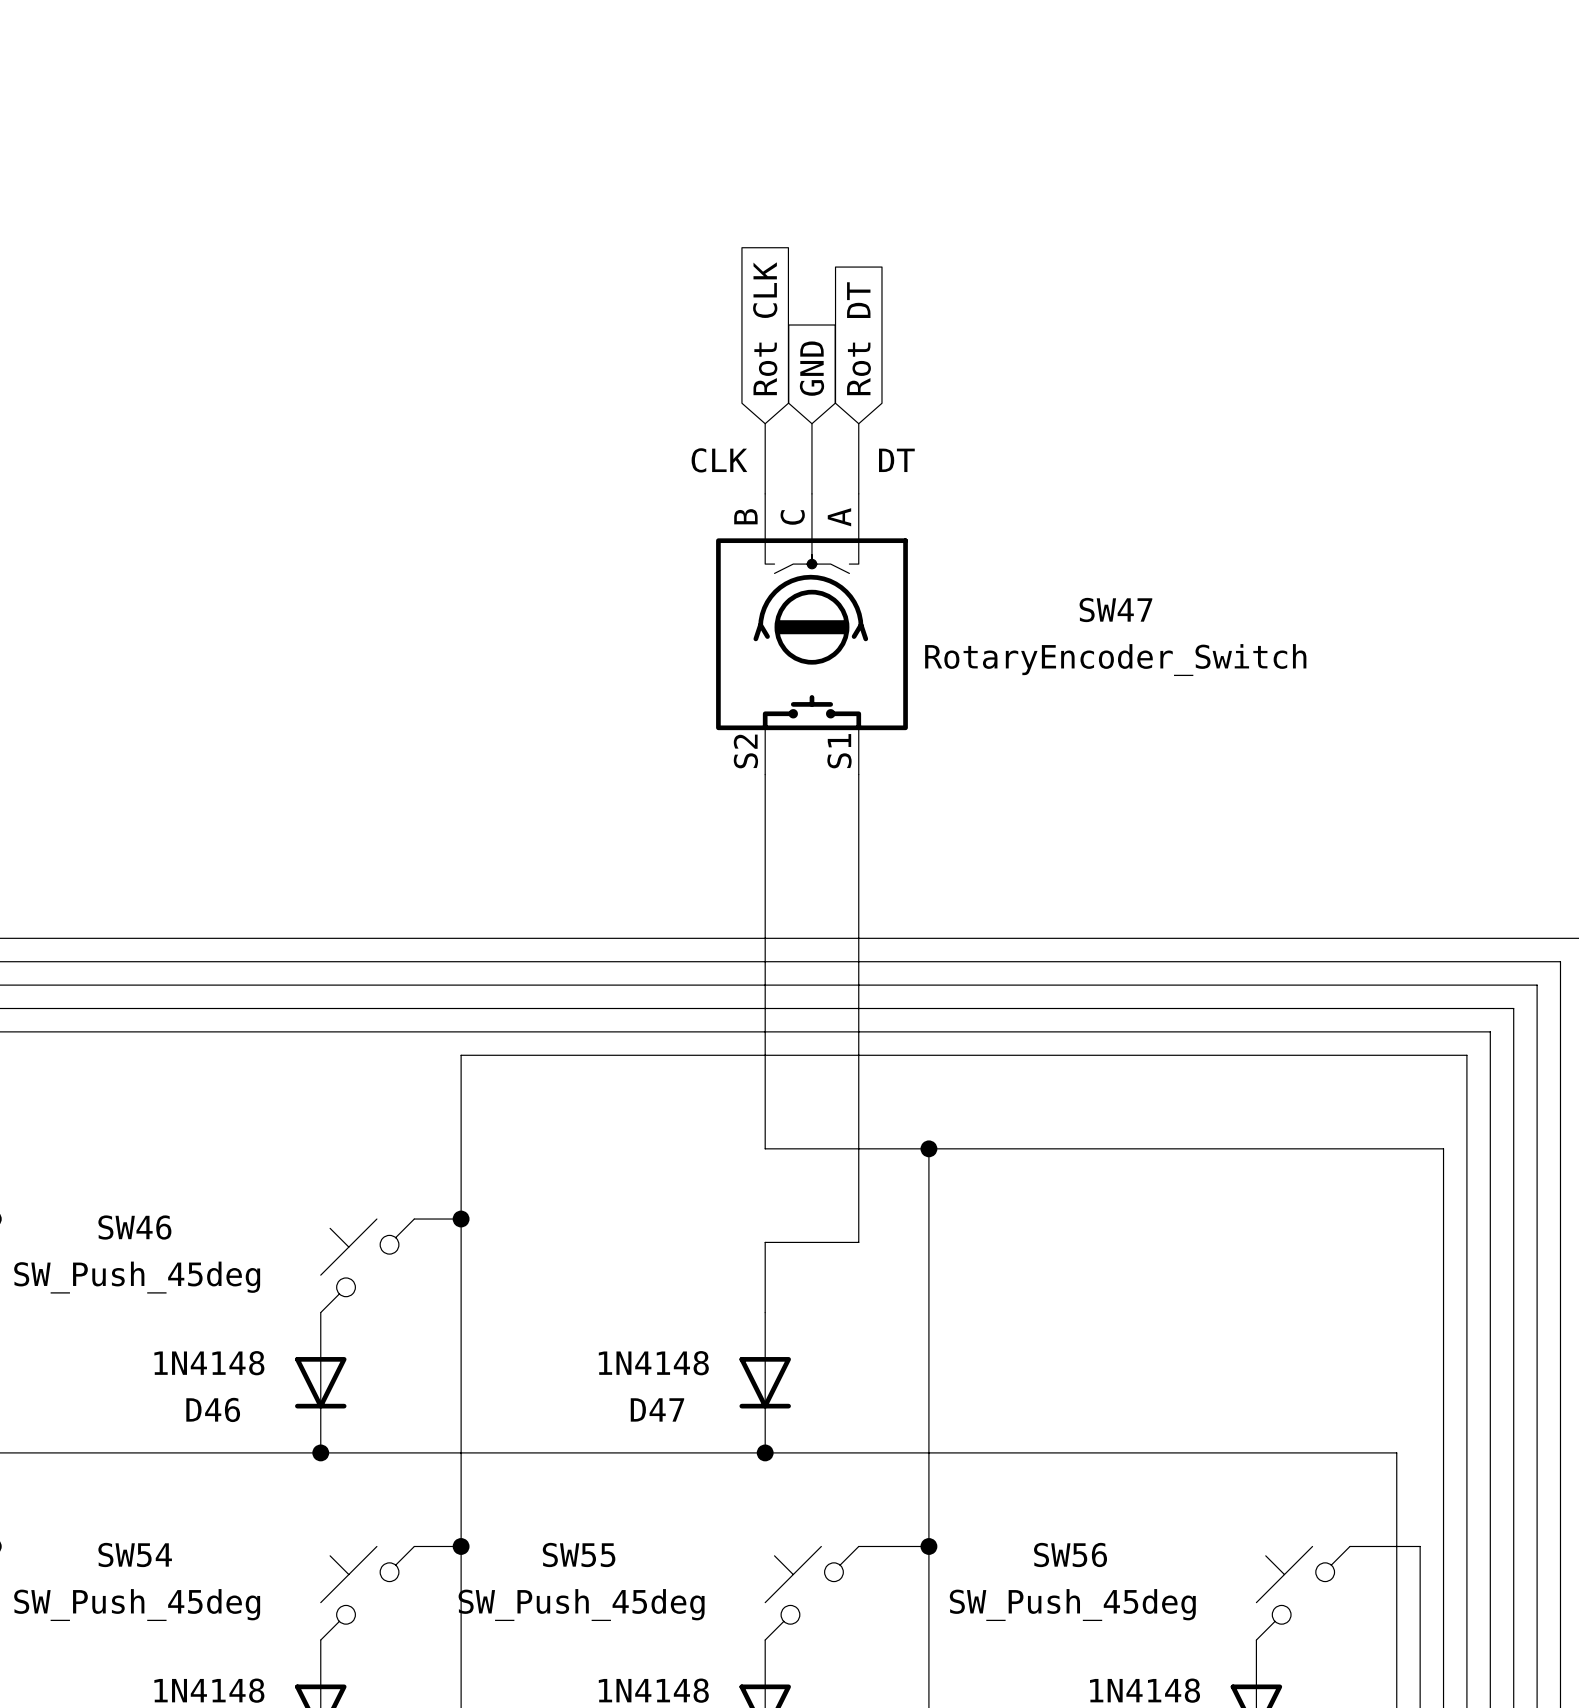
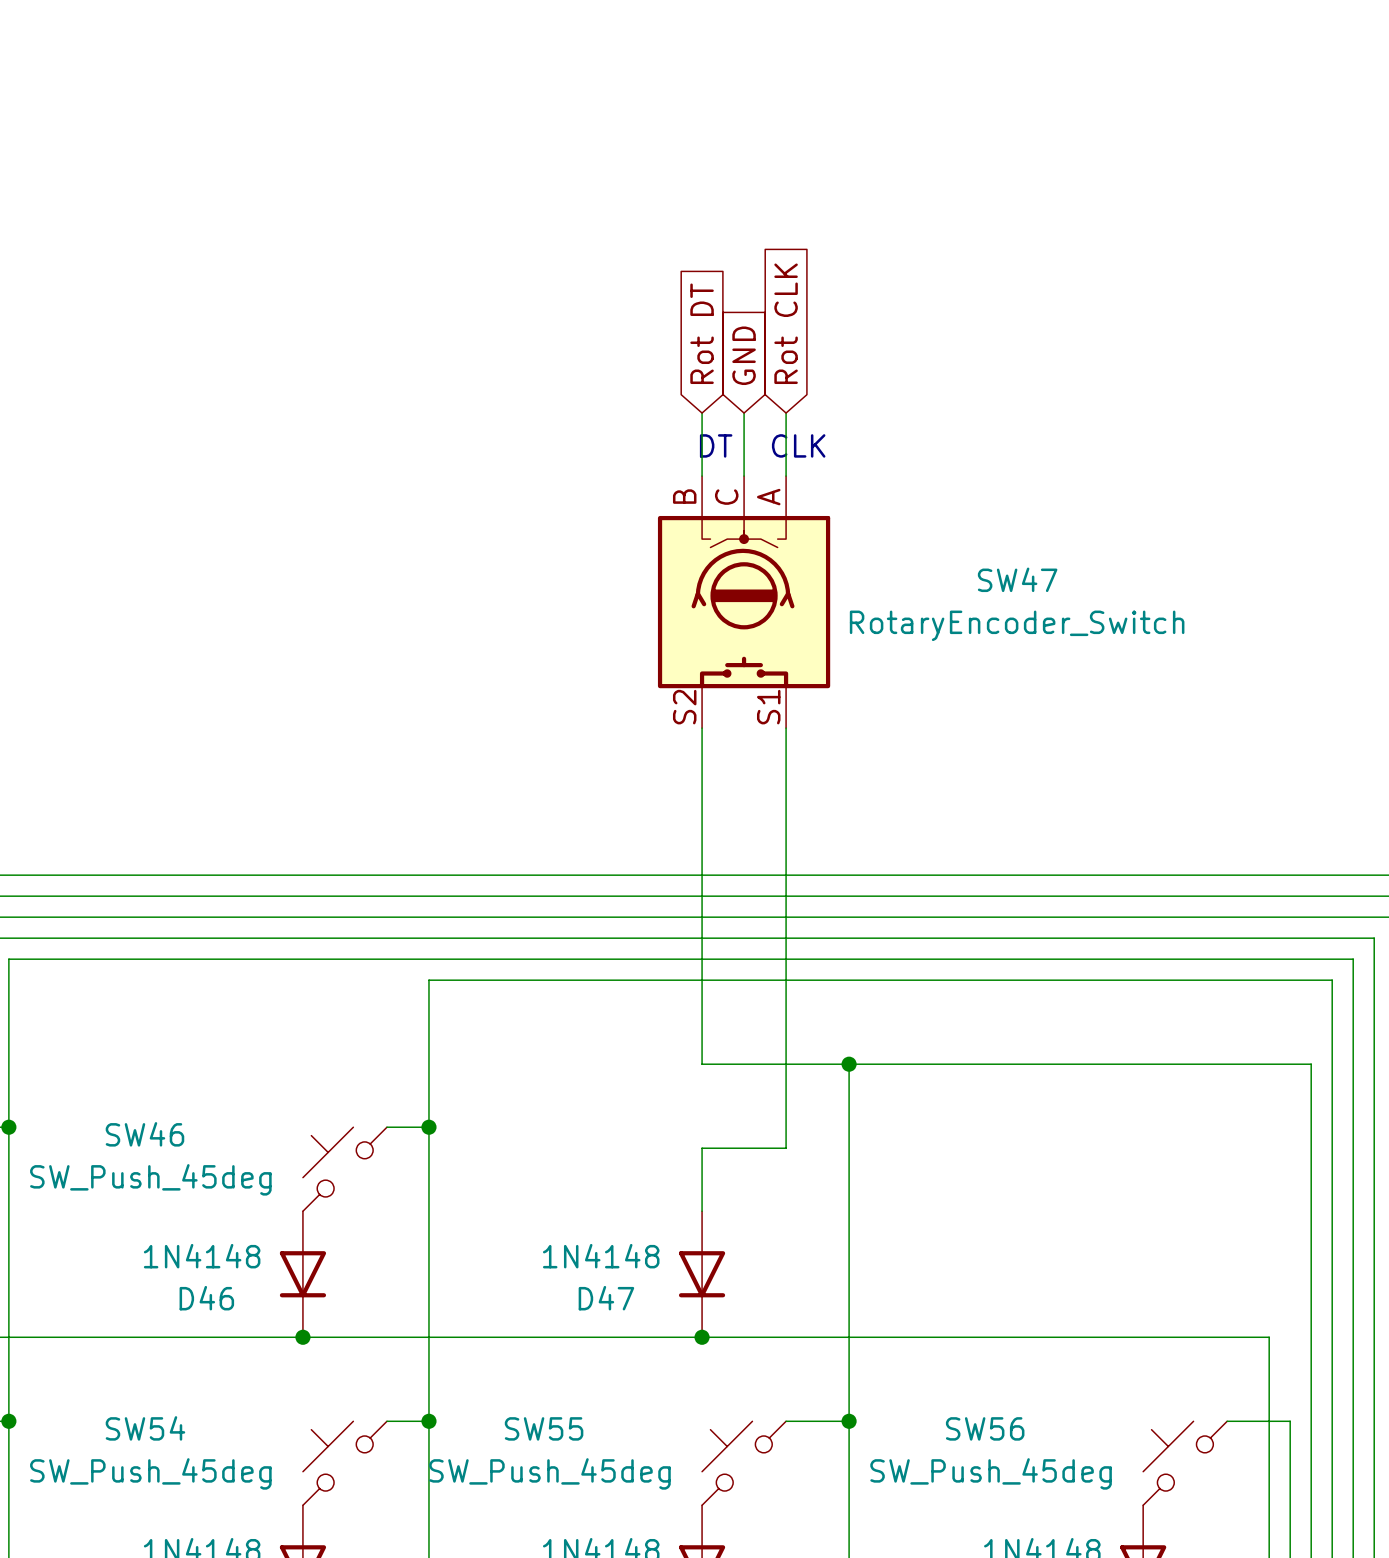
global label: Rot CLK (765, 328) -> Rot DT (702, 333)
global label: Rot DT (858, 338) -> Rot CLK (786, 323)
text position: CLK (719, 460) -> CLK (798, 445)
text position: DT (896, 460) -> DT (716, 445)

